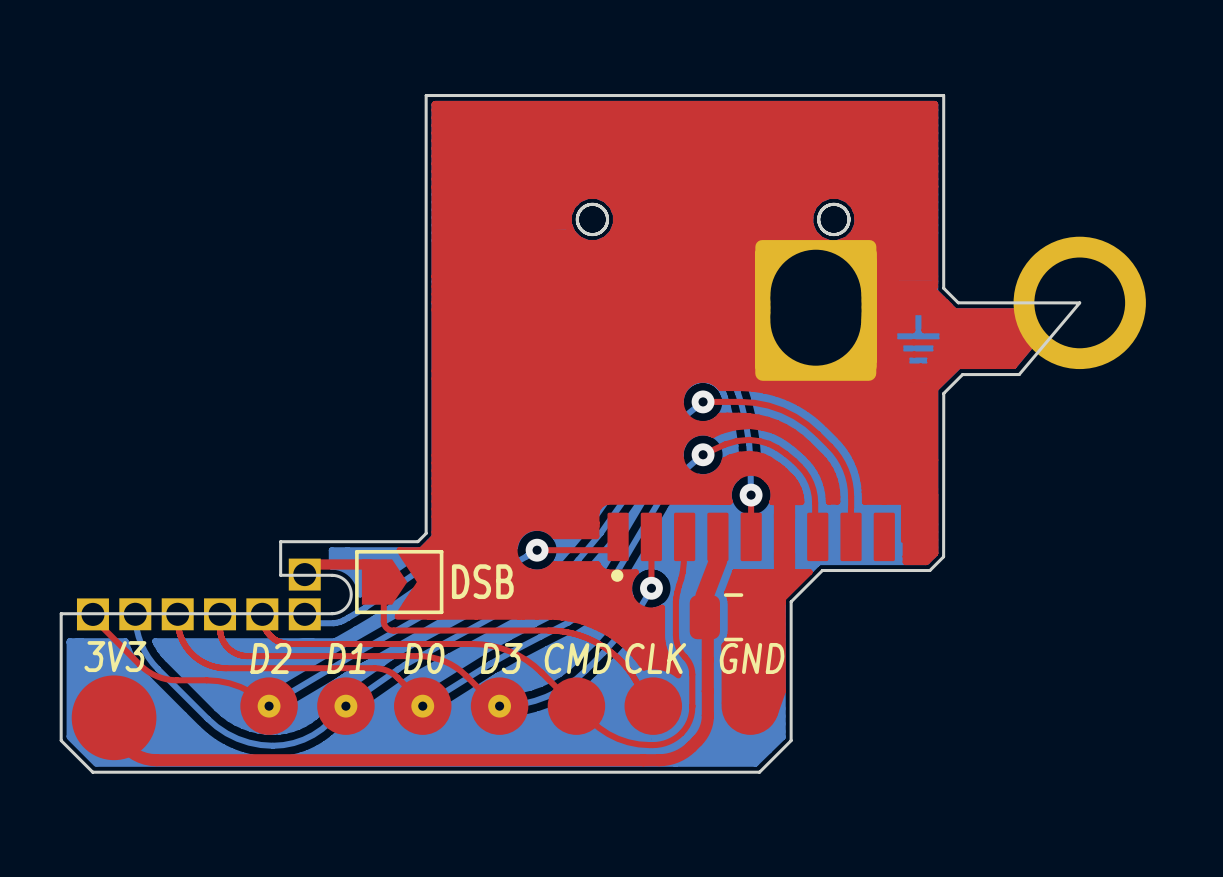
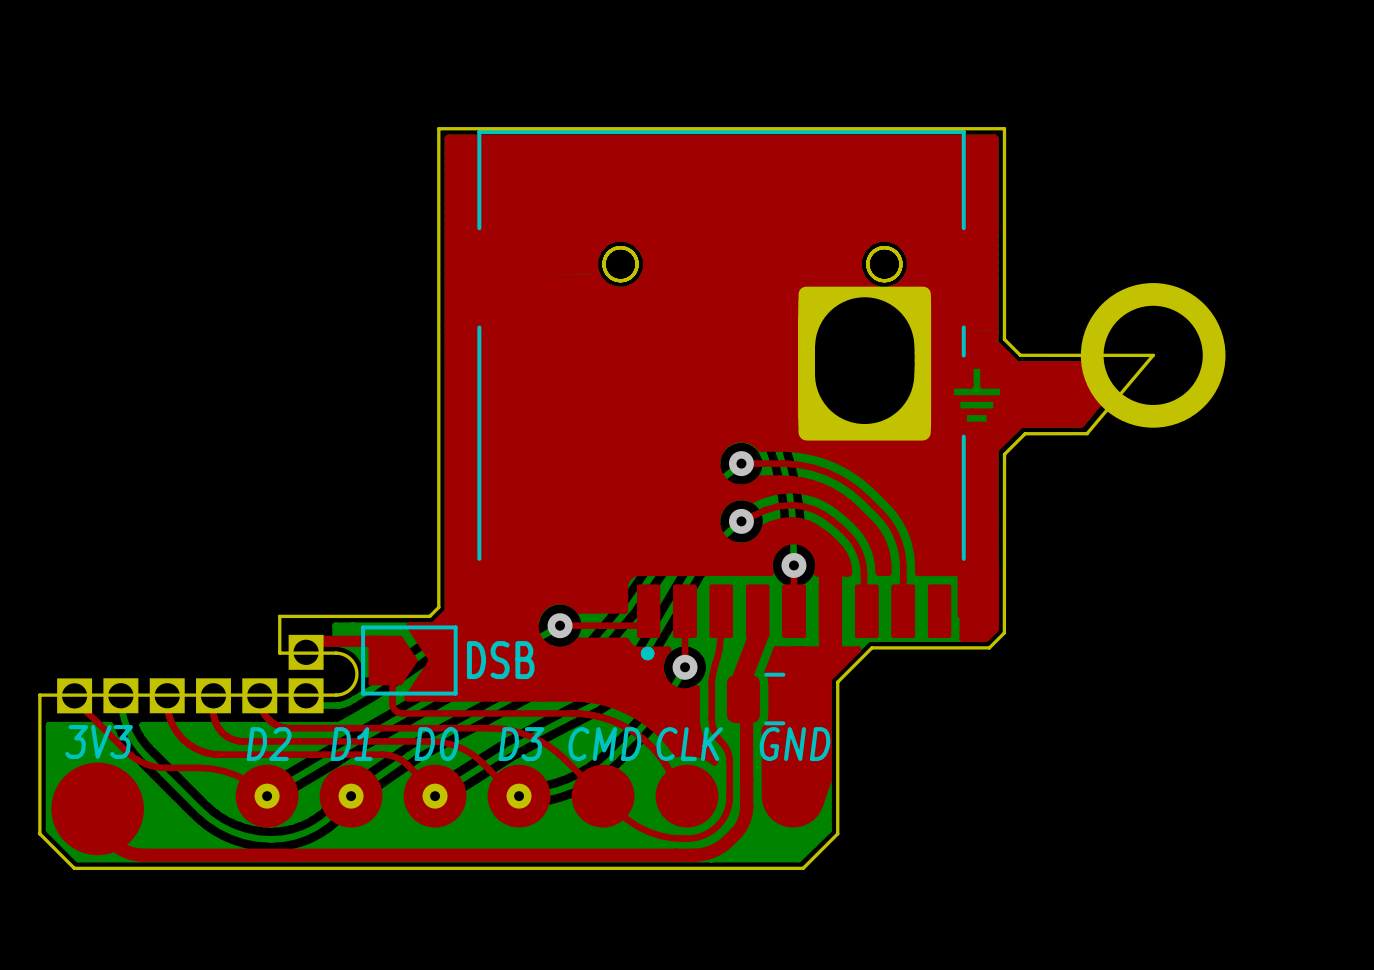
part: none -> (721, 395)

